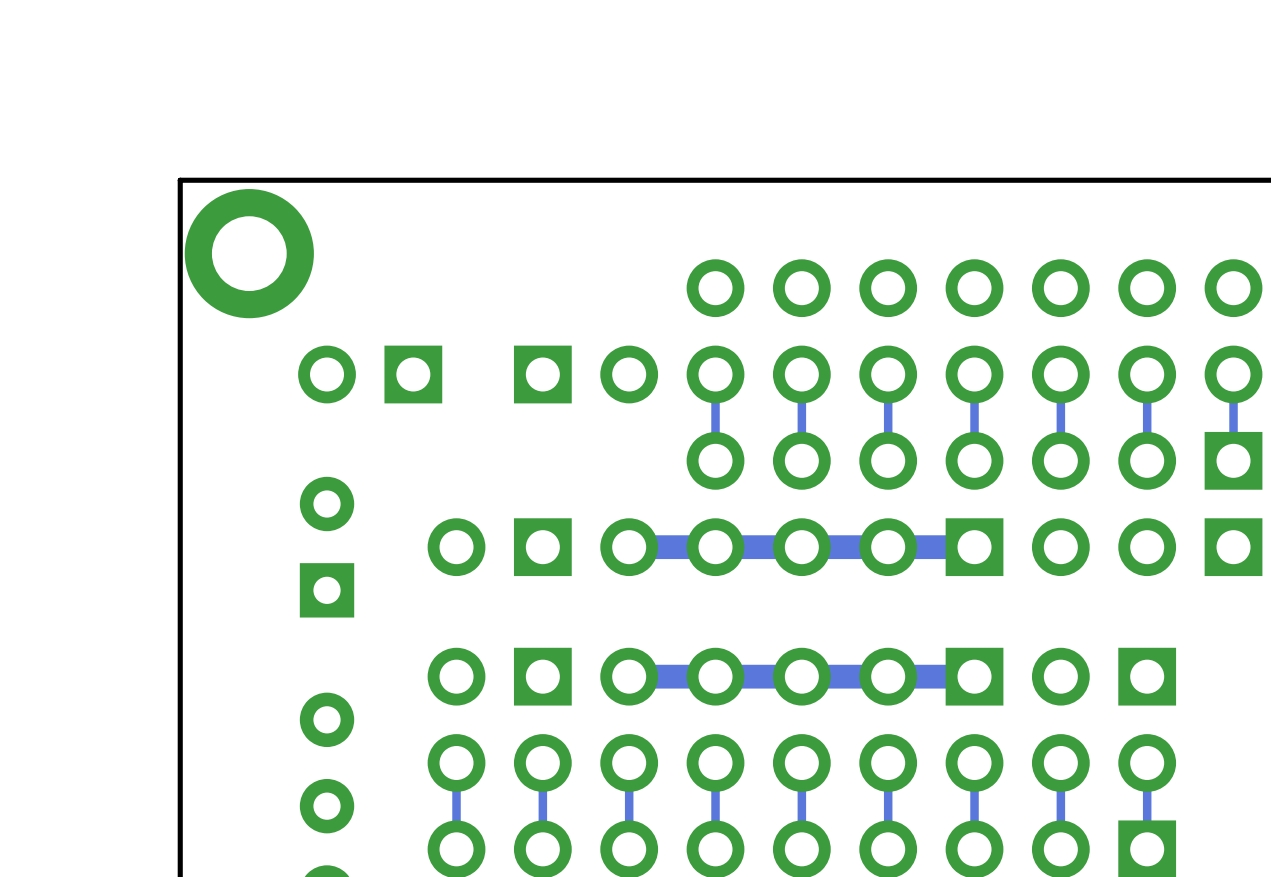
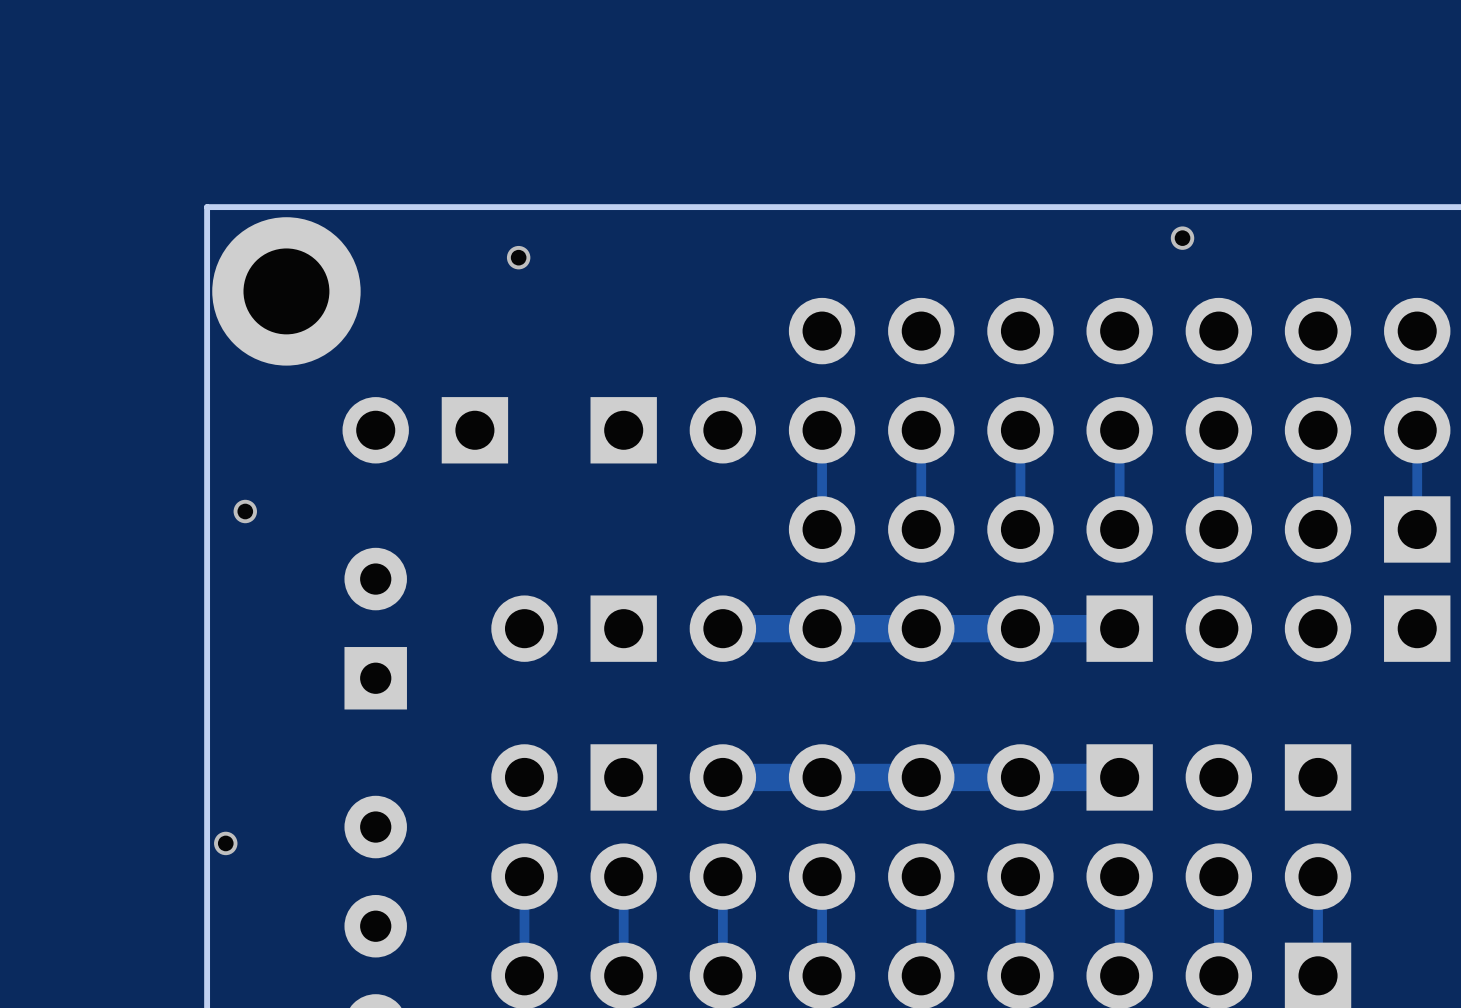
via: none -> (1182, 238)
via: none -> (518, 257)
via: none -> (245, 511)
via: none -> (225, 843)

